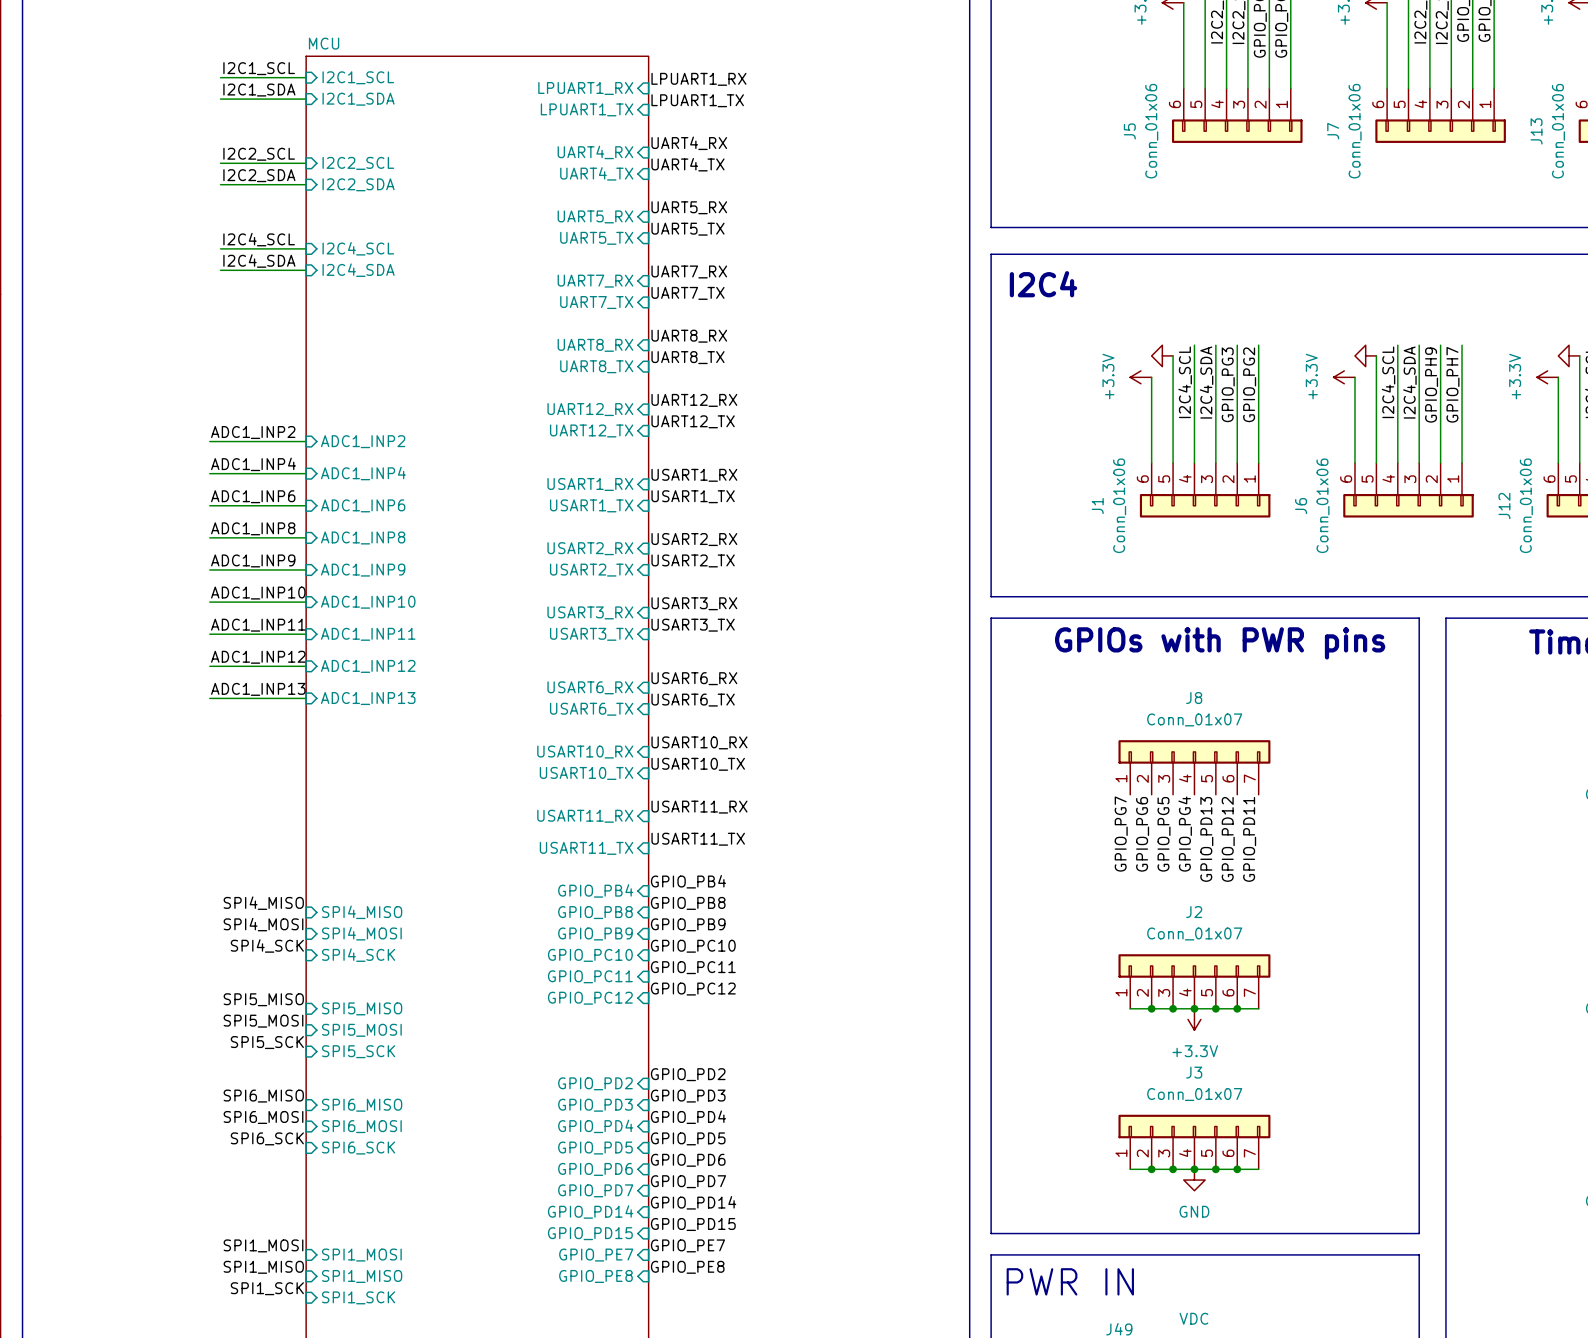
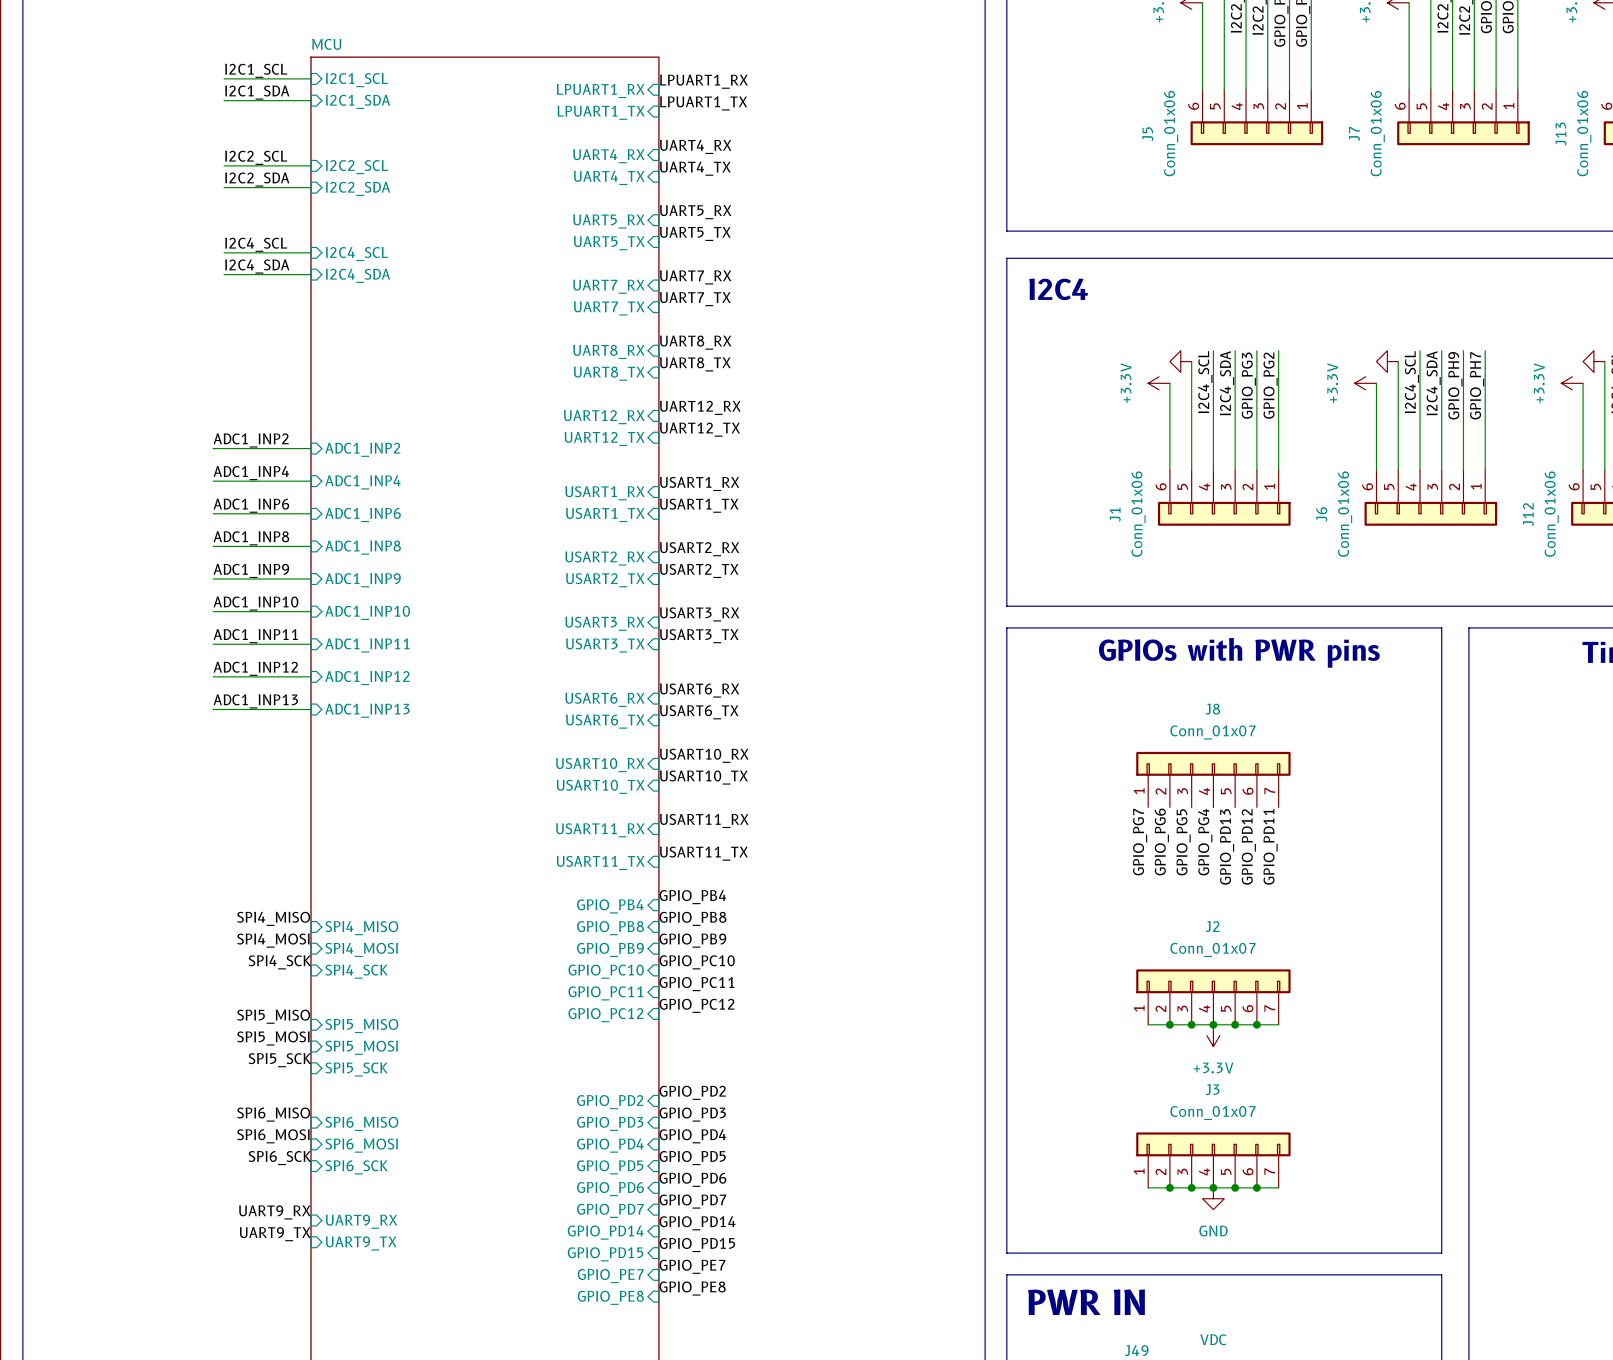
label: none -> UART9_RX (274, 1212)
sheet pin: none -> UART9_RX (361, 1221)
label: none -> UART9_TX (275, 1234)
sheet pin: none -> UART9_TX (361, 1243)
label: SPI1_MOSI (263, 1245) -> none
sheet pin: SPI1_MOSI (361, 1255) -> none
label: SPI1_MISO (263, 1267) -> none
sheet pin: SPI1_MISO (362, 1276) -> none
label: SPI1_SCK (267, 1288) -> none
sheet pin: SPI1_SCK (358, 1297) -> none

